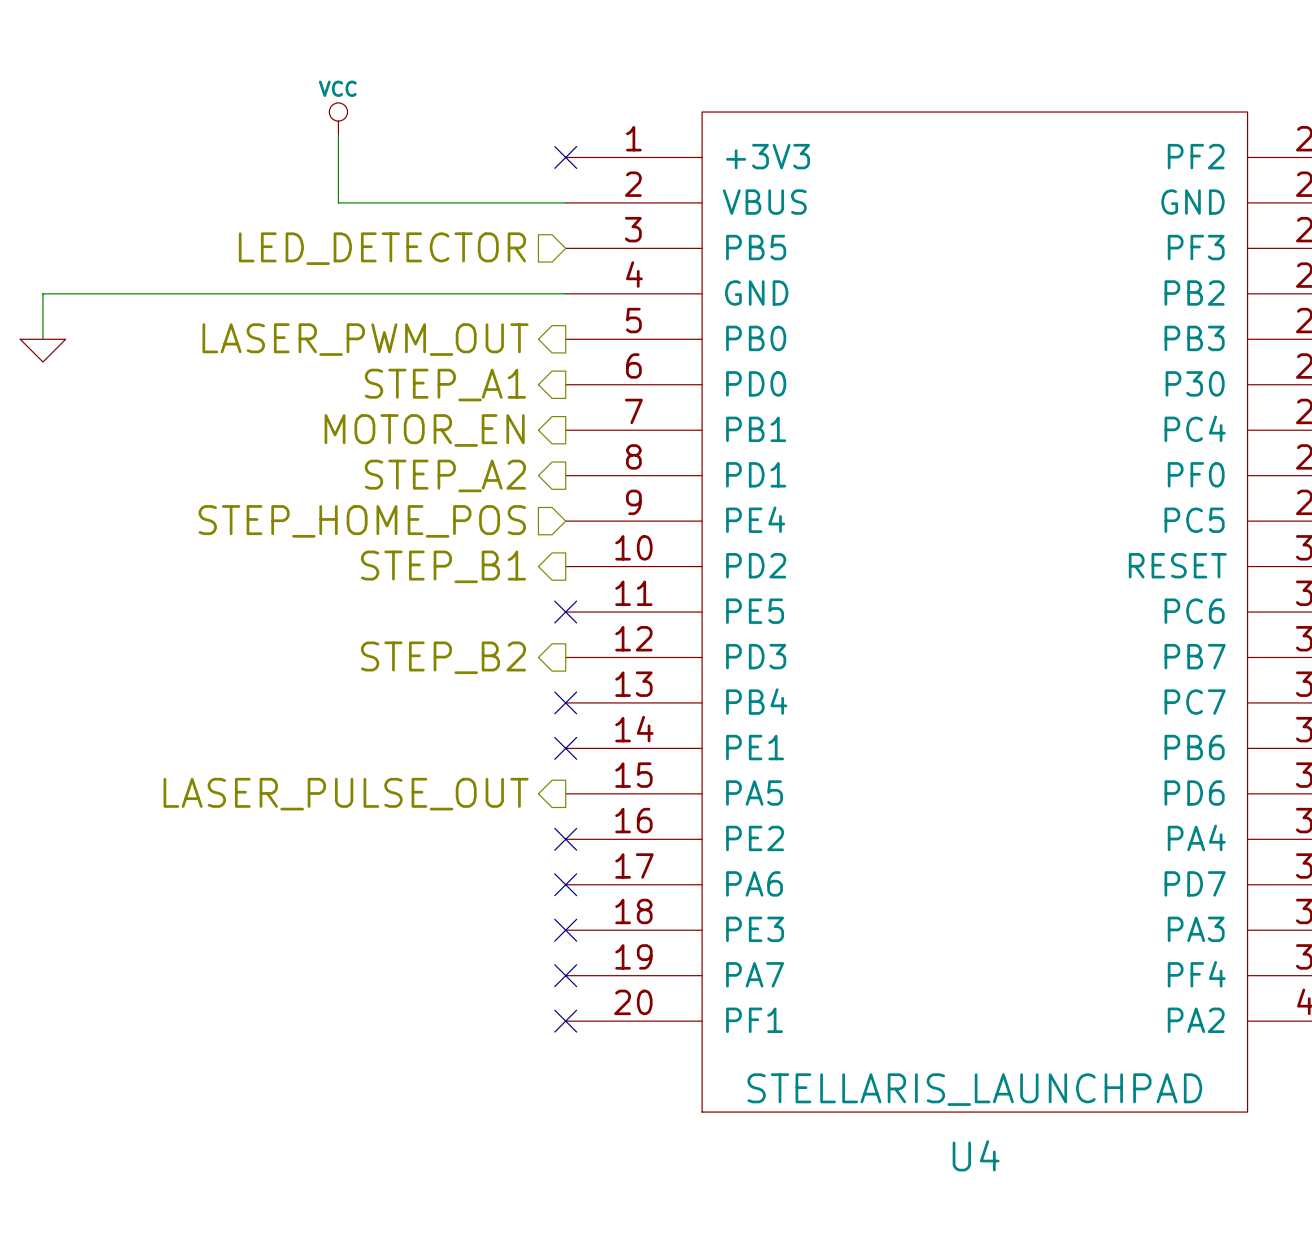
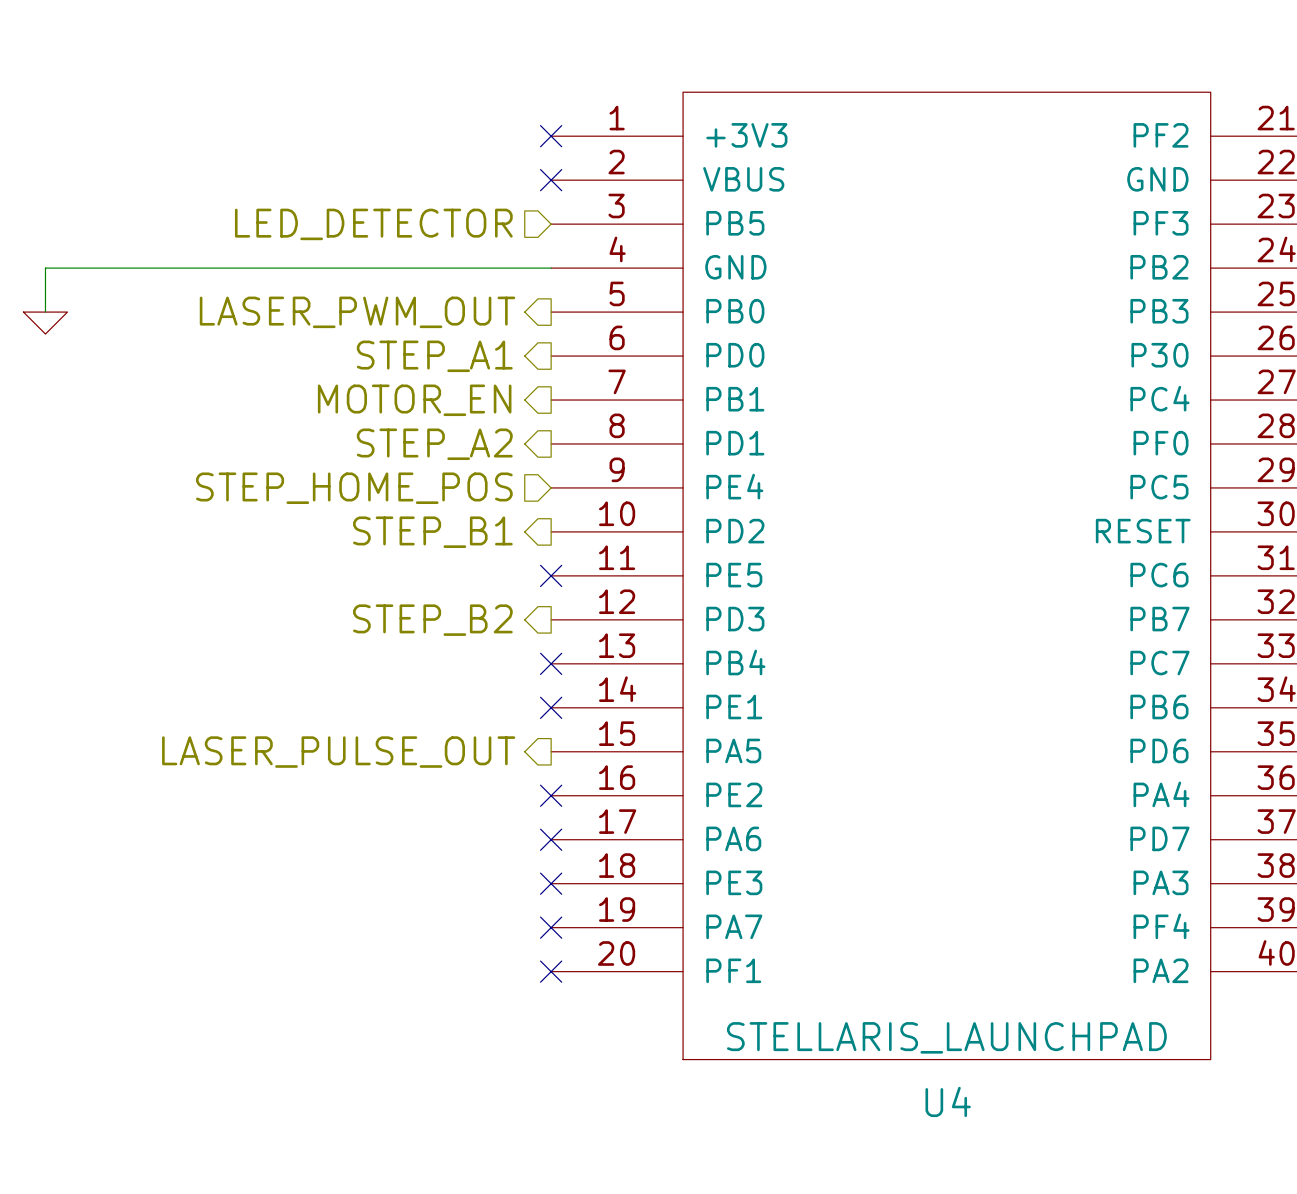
power symbol: VCC (338, 118) -> none
wire: (338, 134) (338, 202) (565, 202) -> none
no-connect mark: none -> (551, 180)

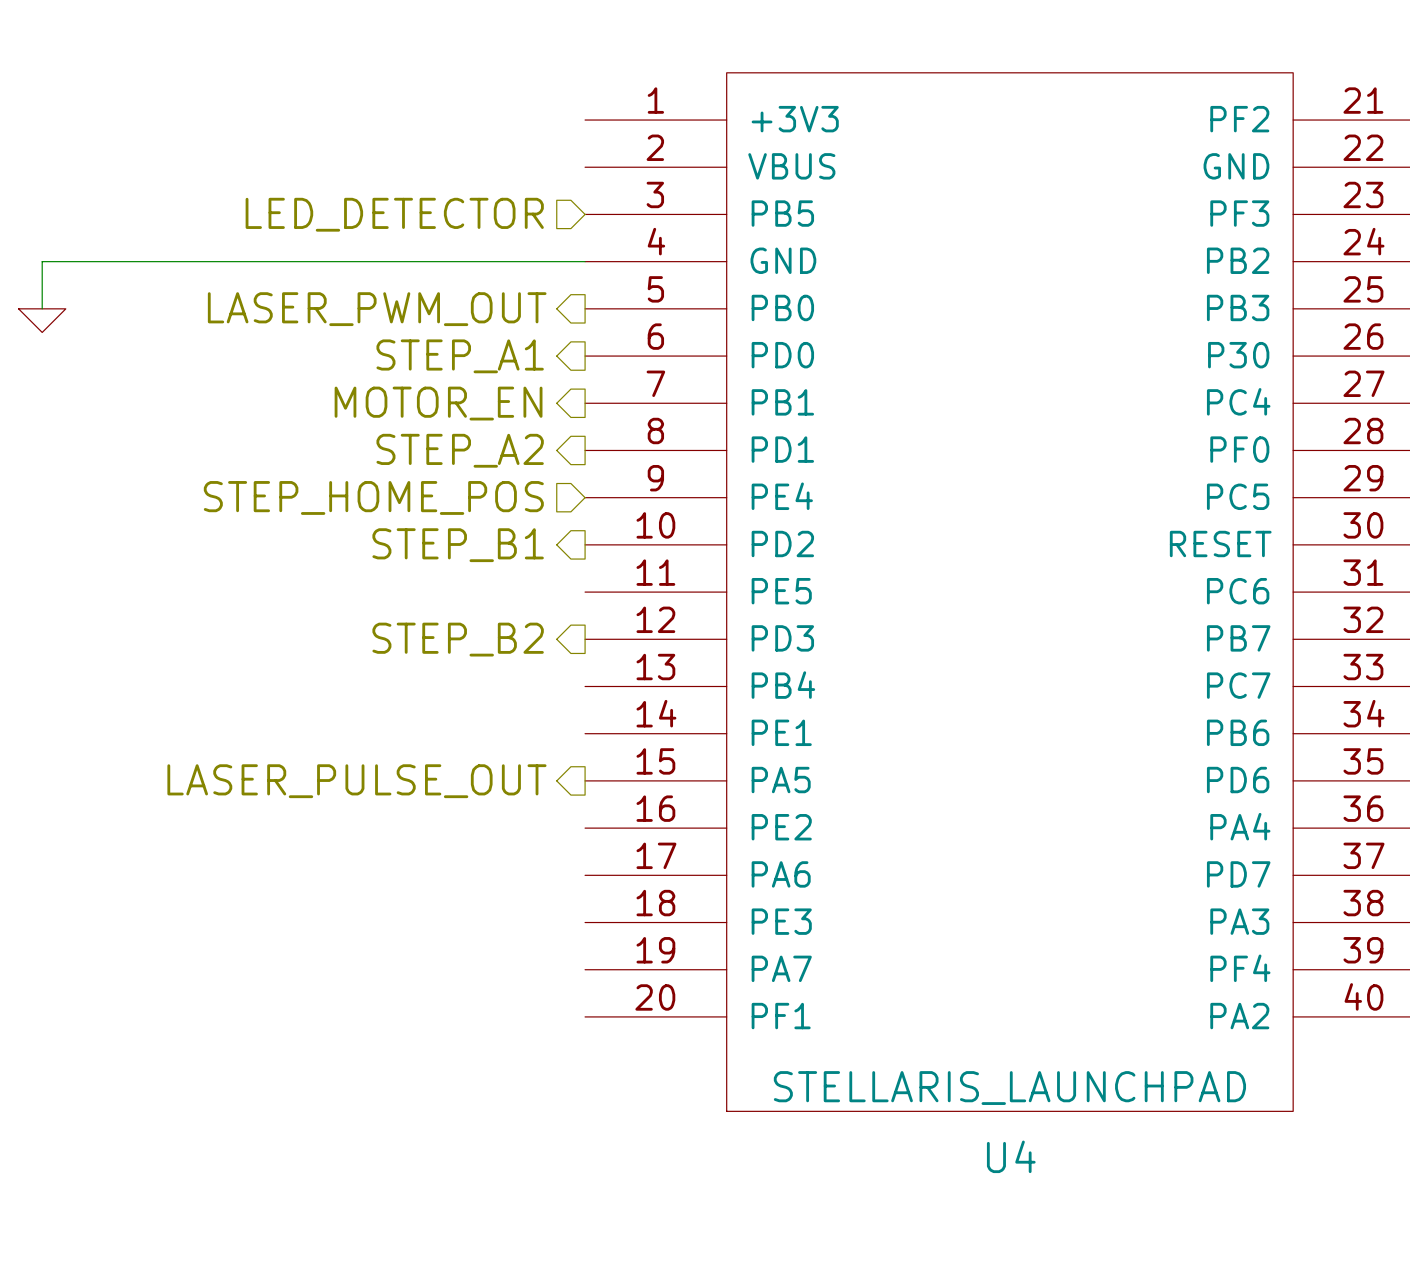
no-connect mark: (551, 136) -> none
no-connect mark: (551, 180) -> none
no-connect mark: (551, 575) -> none
no-connect mark: (551, 663) -> none
no-connect mark: (551, 707) -> none
no-connect mark: (551, 795) -> none
no-connect mark: (551, 839) -> none
no-connect mark: (551, 883) -> none
no-connect mark: (551, 927) -> none
no-connect mark: (551, 971) -> none

